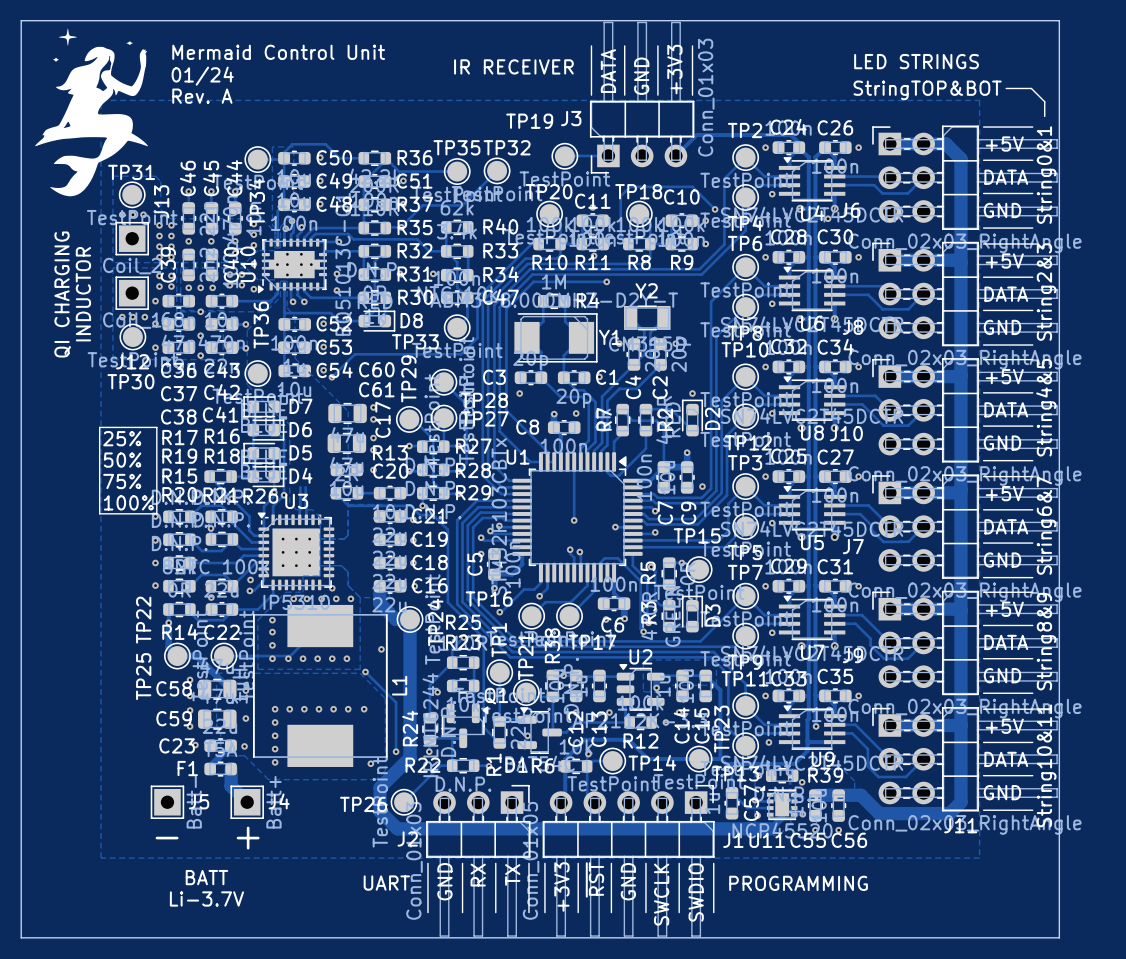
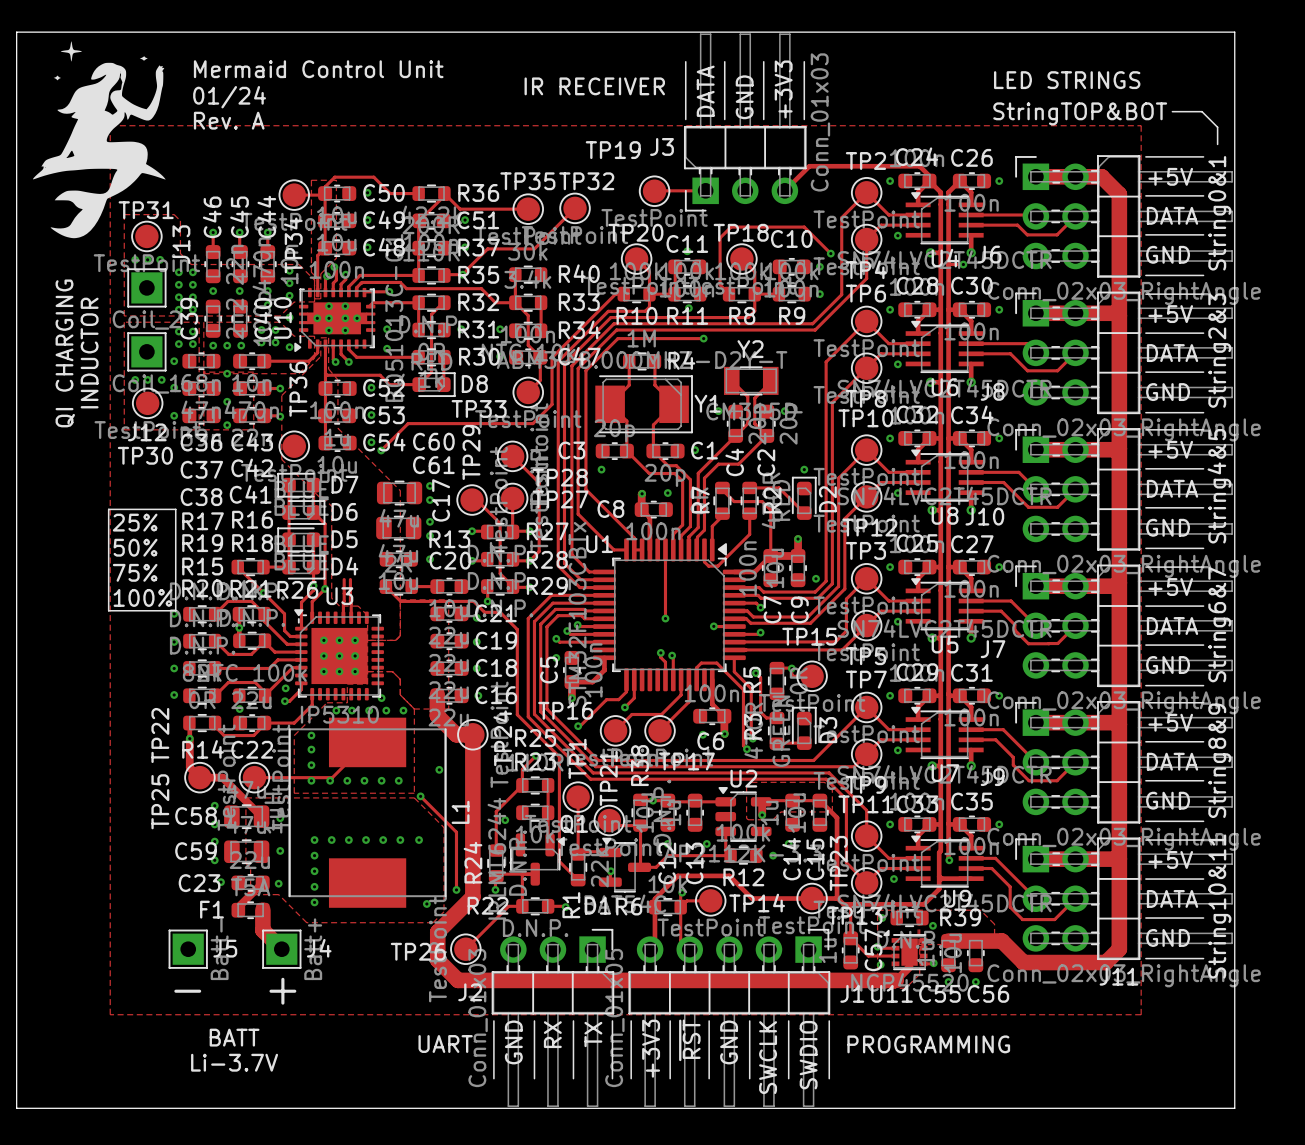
R40 value: 62k (457, 207) -> 30k (527, 251)

